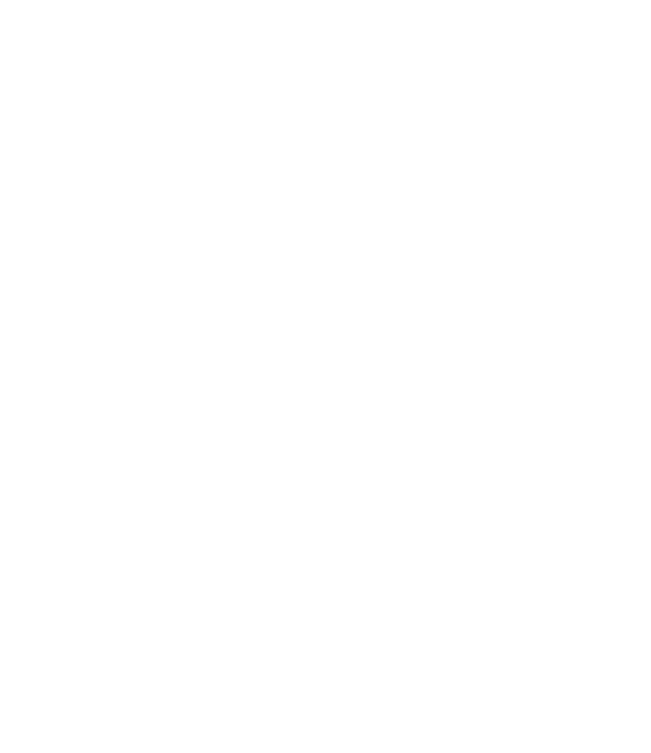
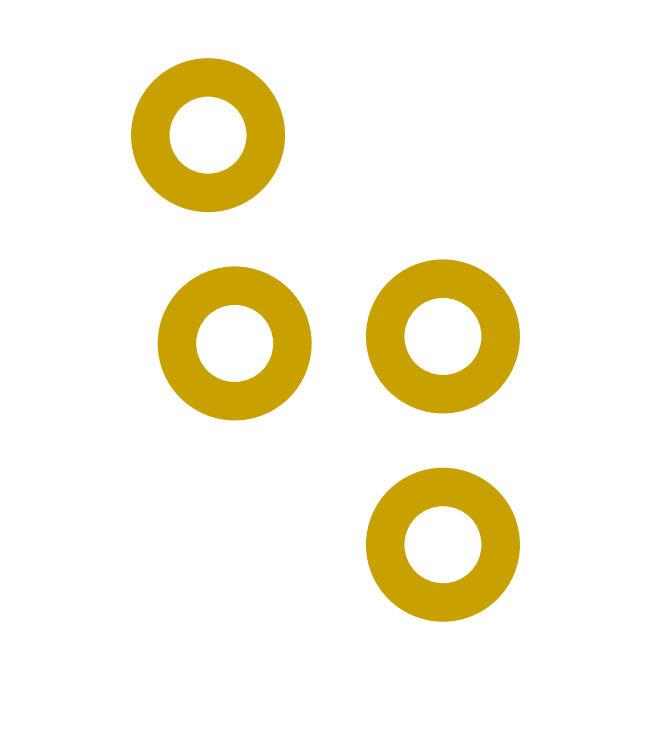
part: none -> (208, 135)
part: none -> (442, 336)
part: none -> (234, 343)
part: none -> (442, 544)

